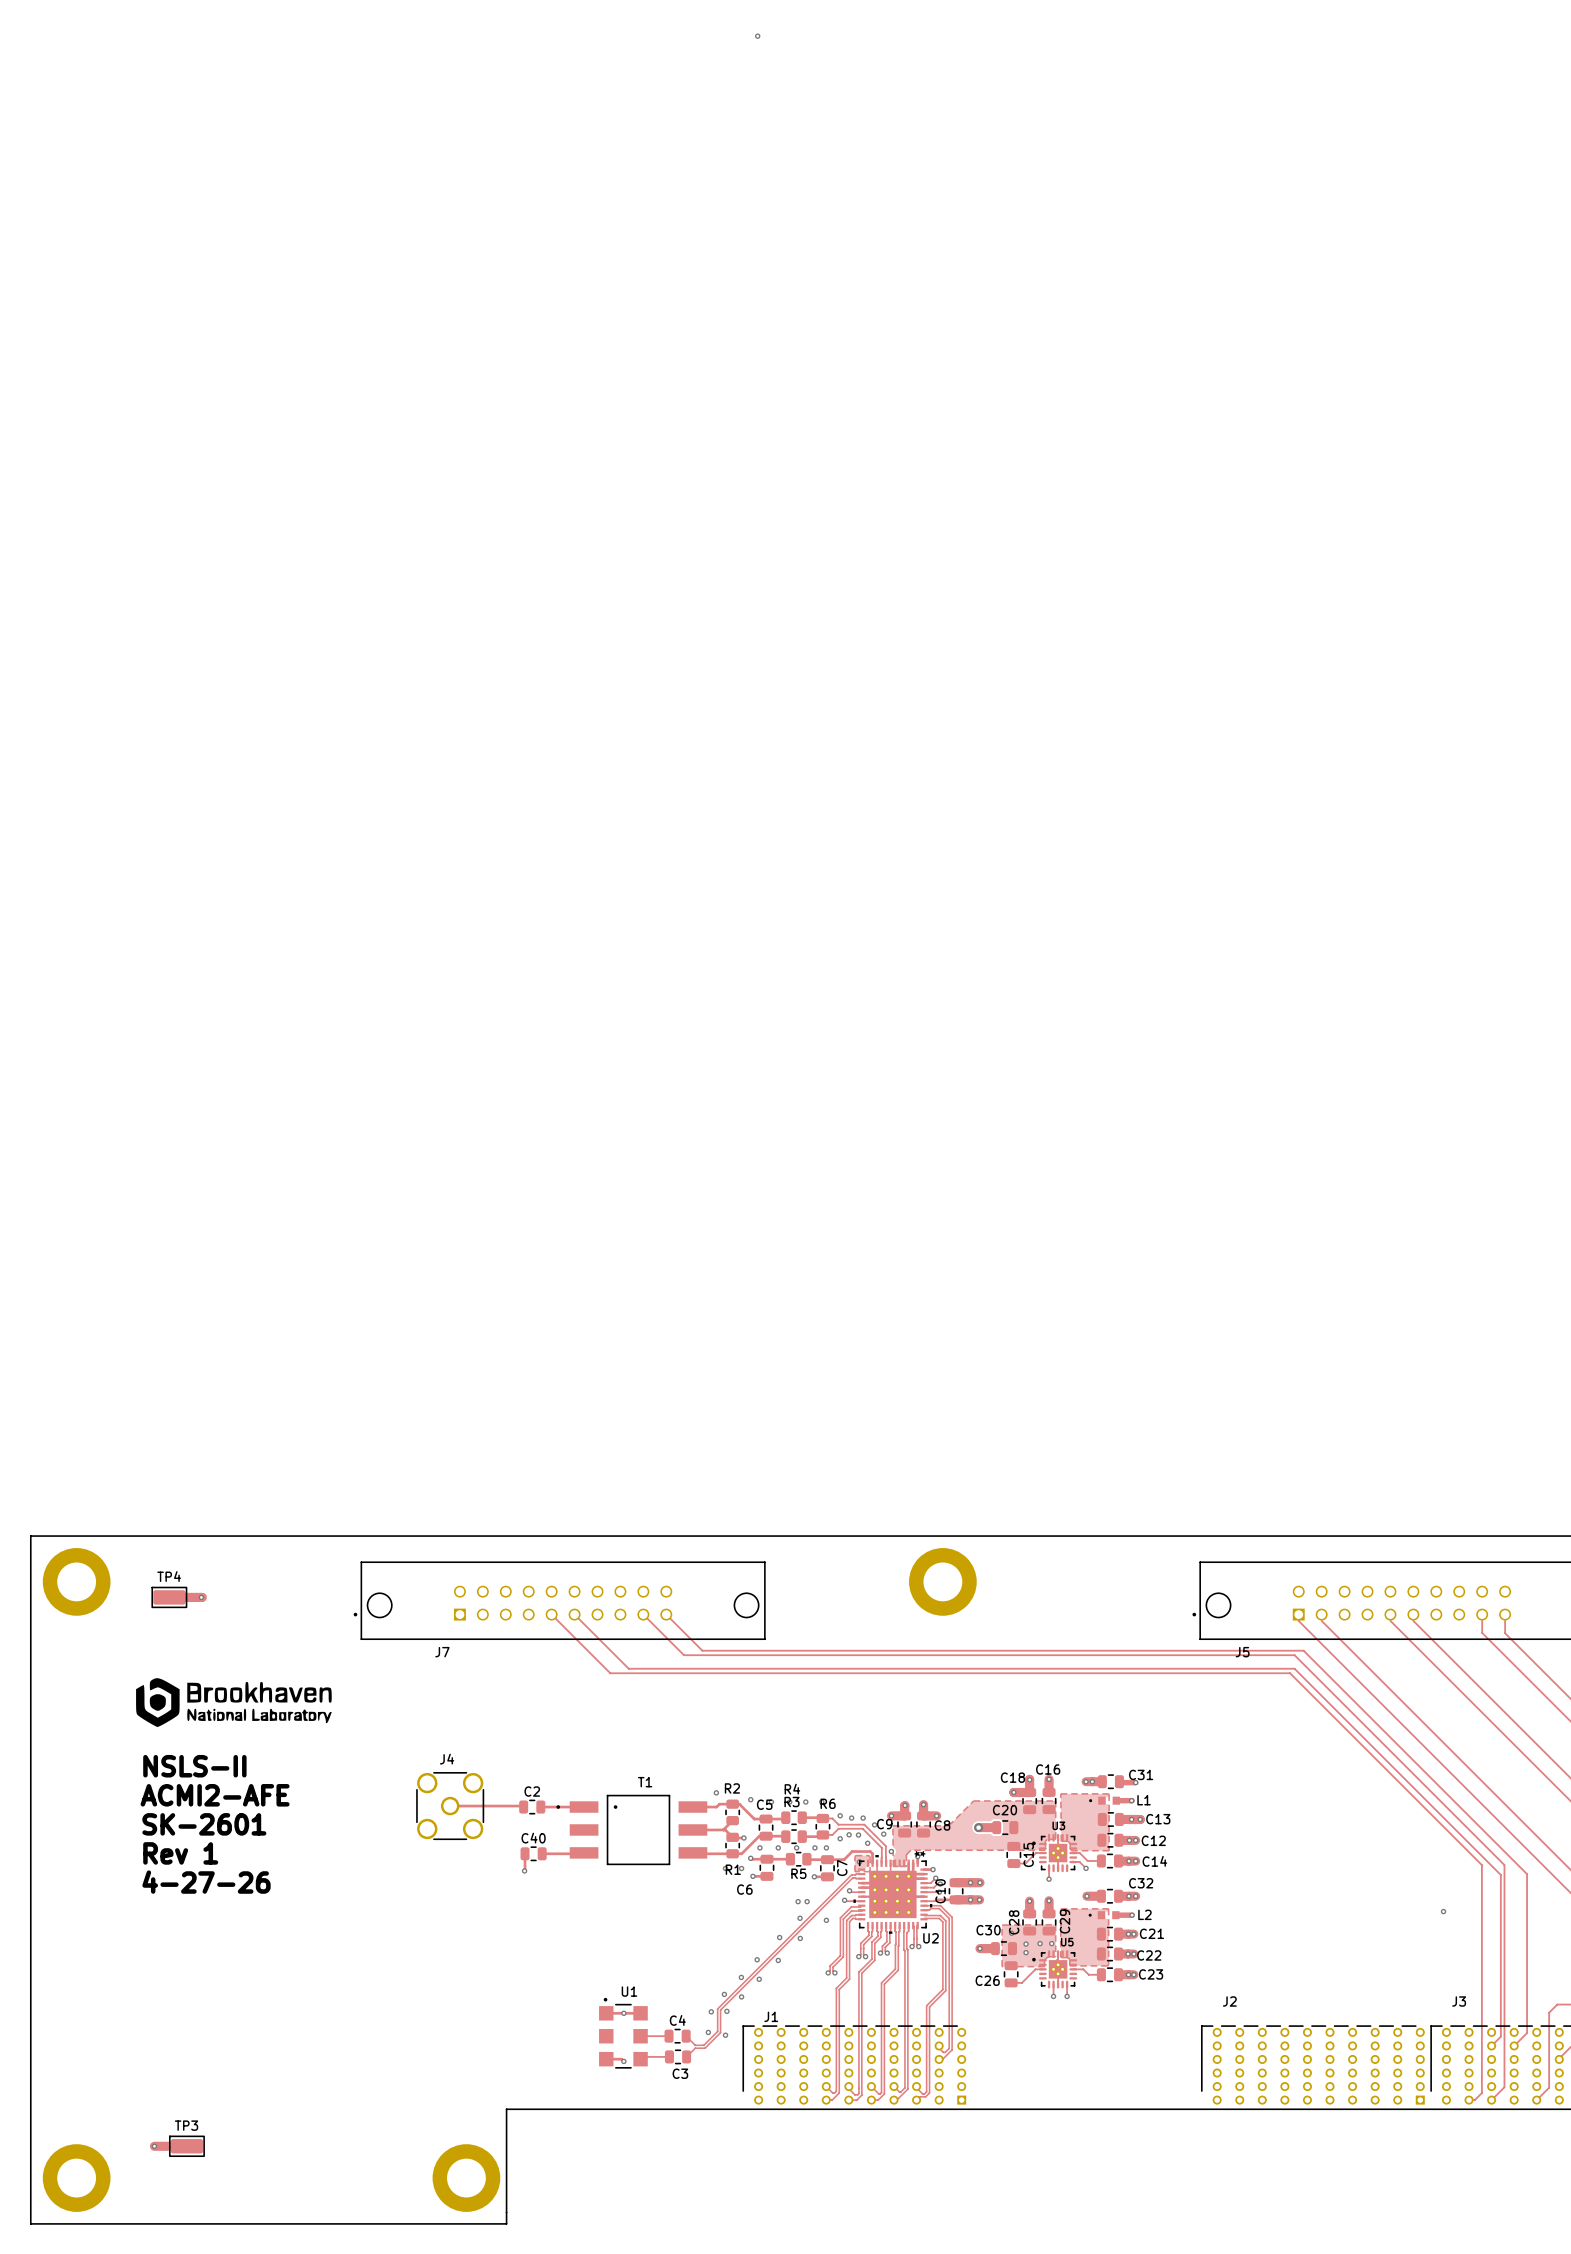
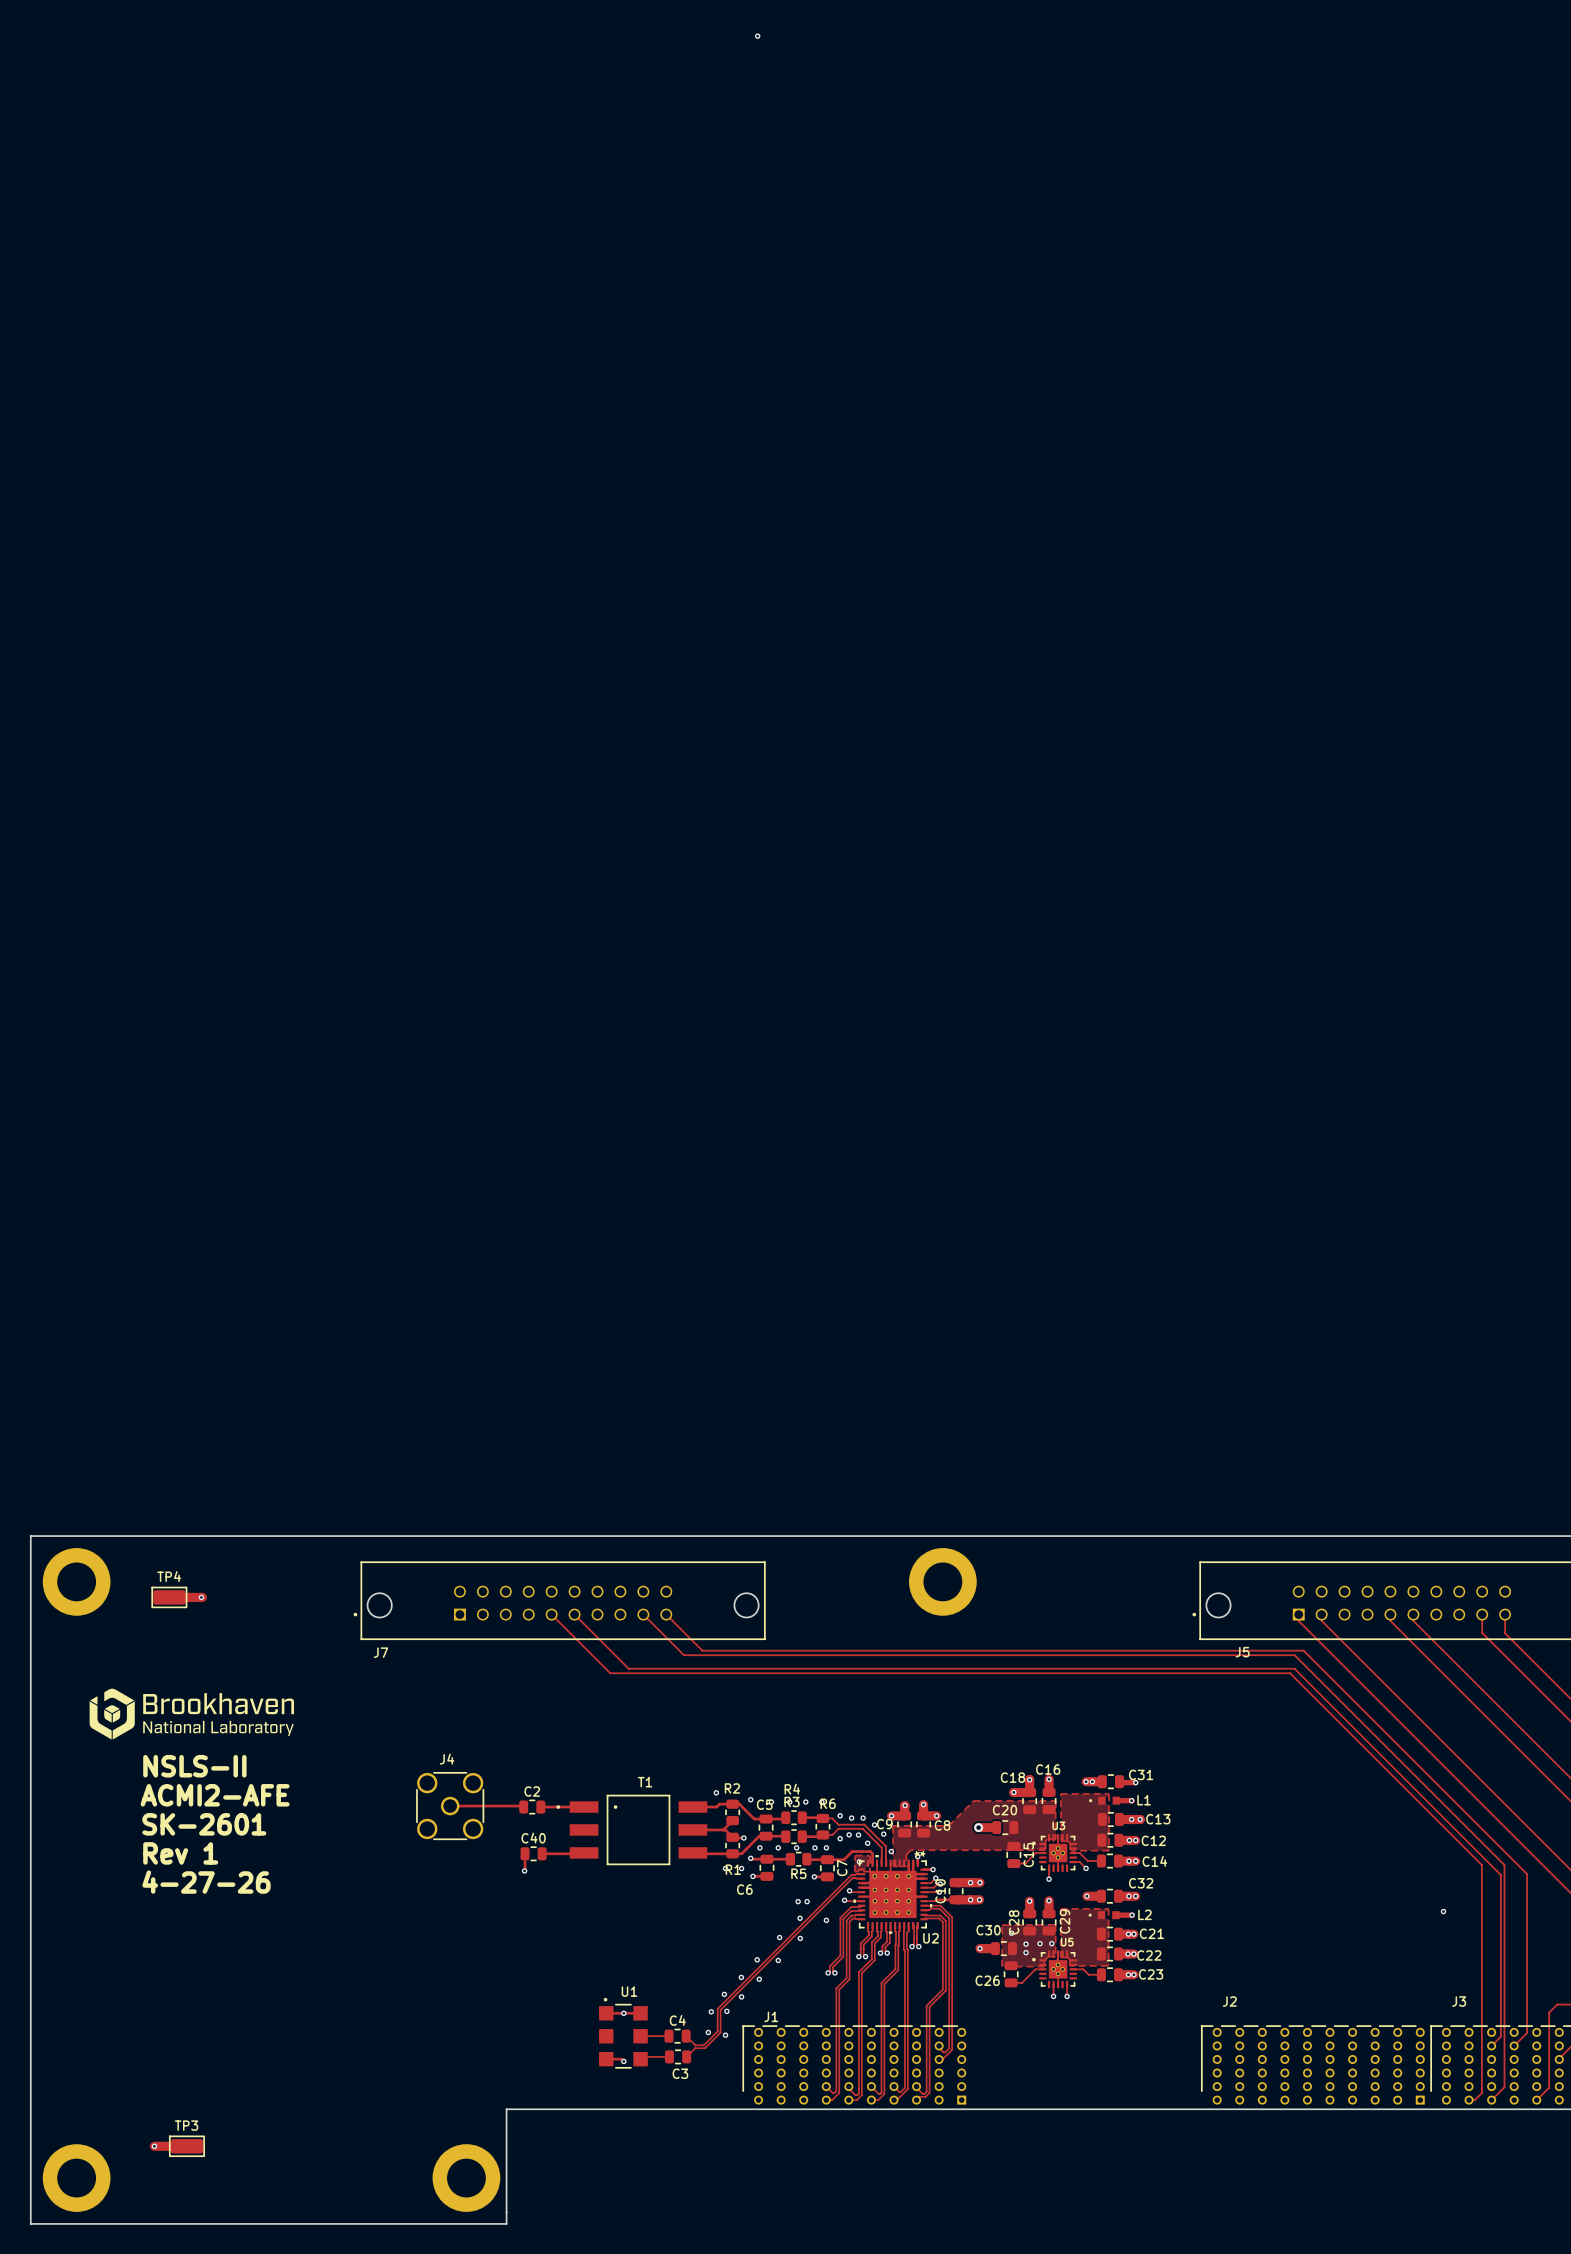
J7 name position: J7 (442, 1652) -> J7 (380, 1652)
drawing: [136, 1678, 332, 1728] -> none
drawing: none -> [89, 1688, 295, 1740]

